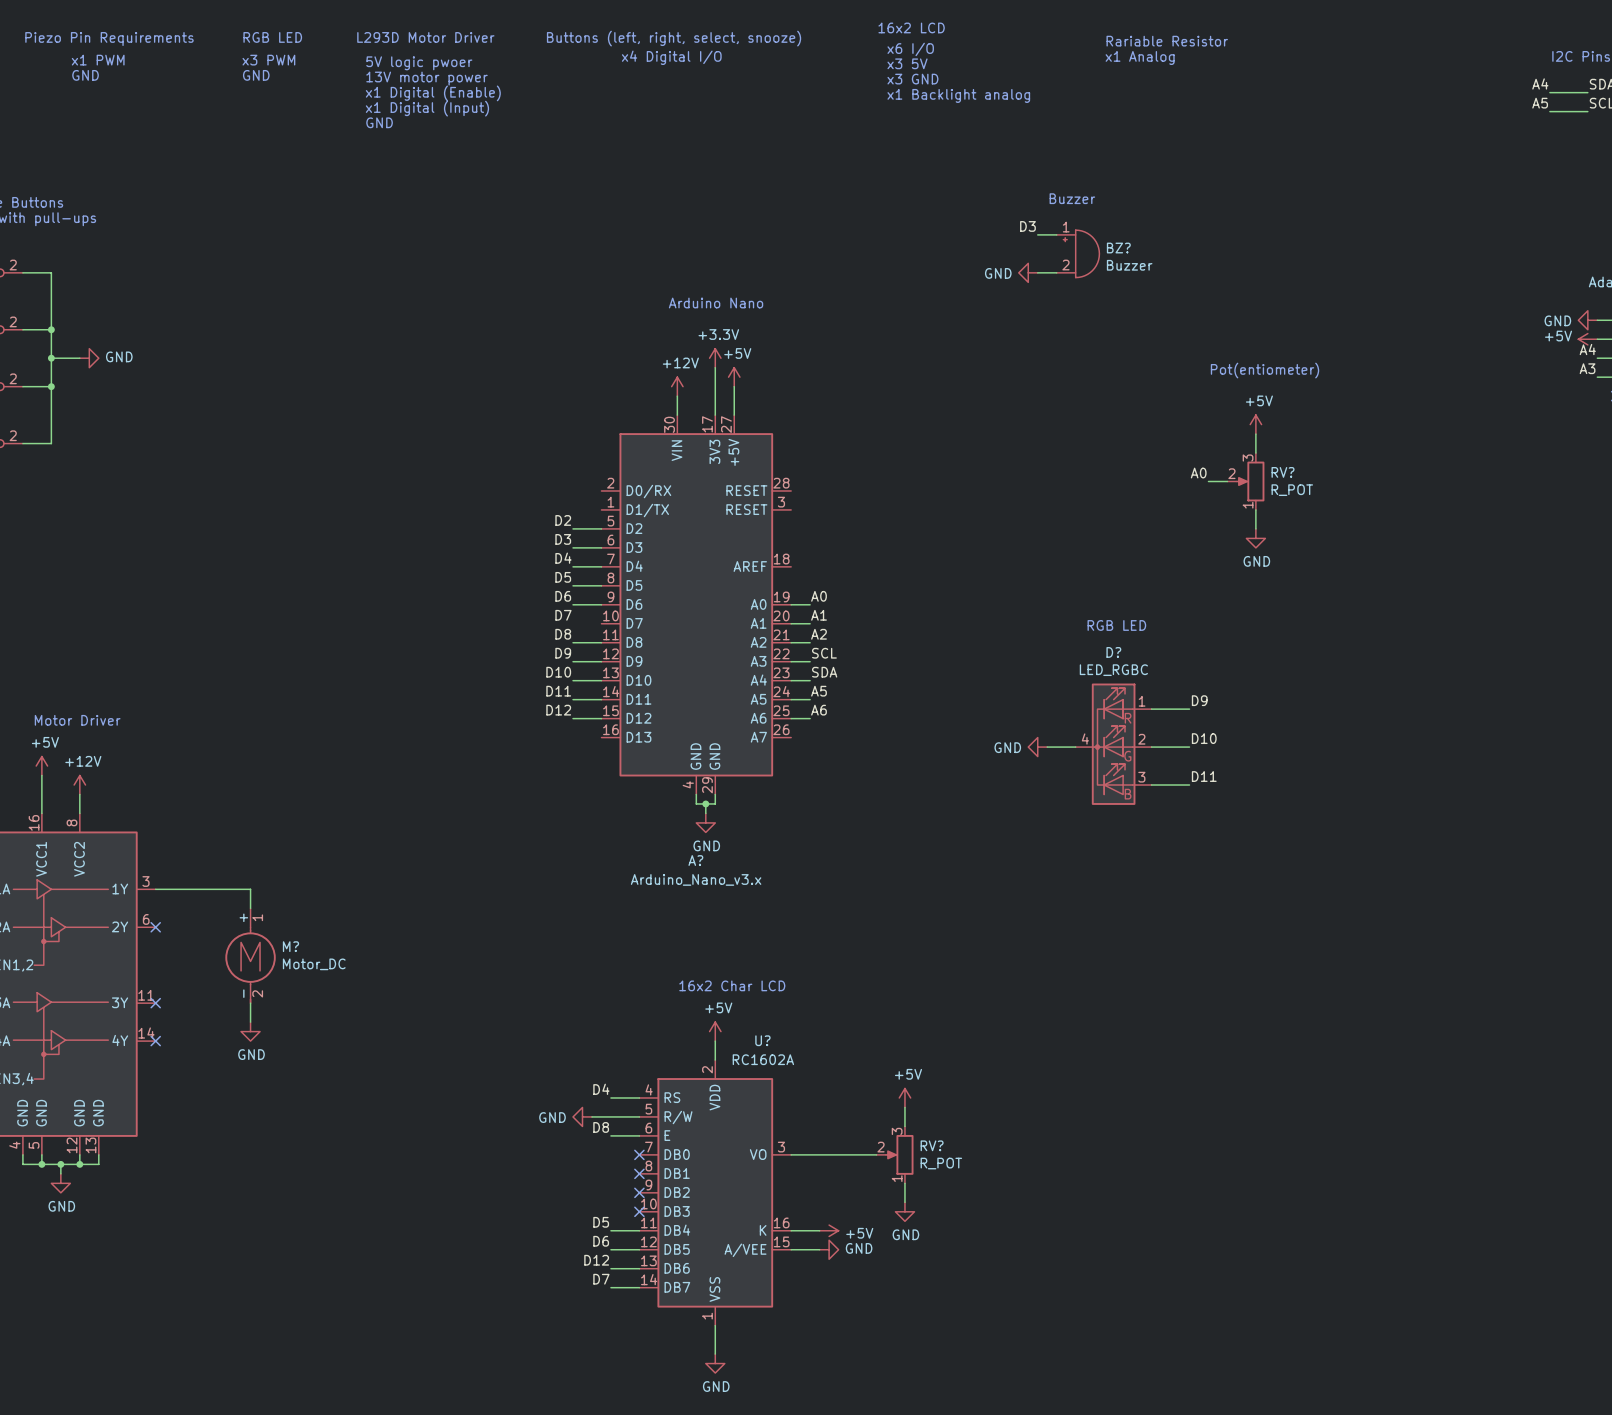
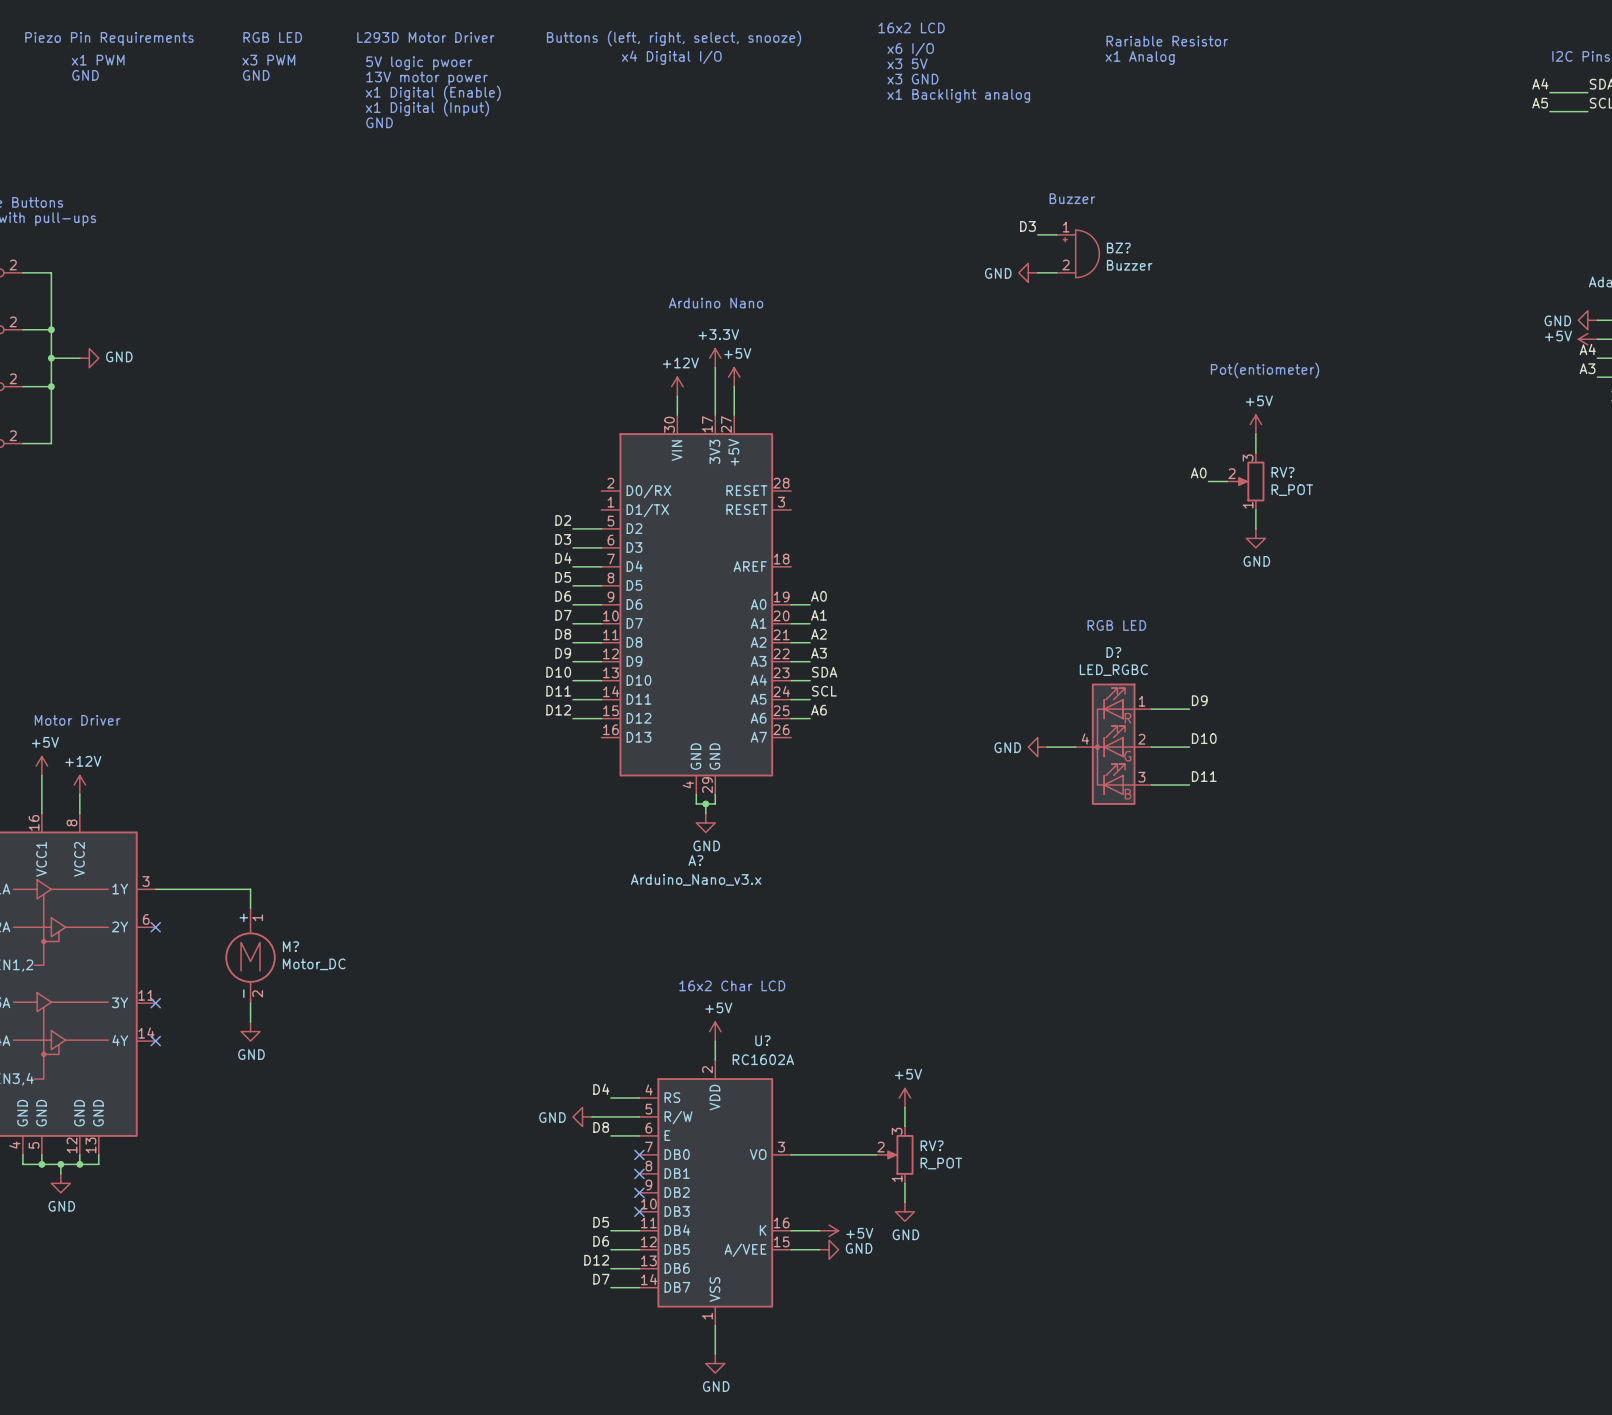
wire: none -> (573, 623) (601, 623)
label: SCL (824, 653) -> A3 (819, 653)
label: A5 (819, 691) -> SCL (824, 691)

